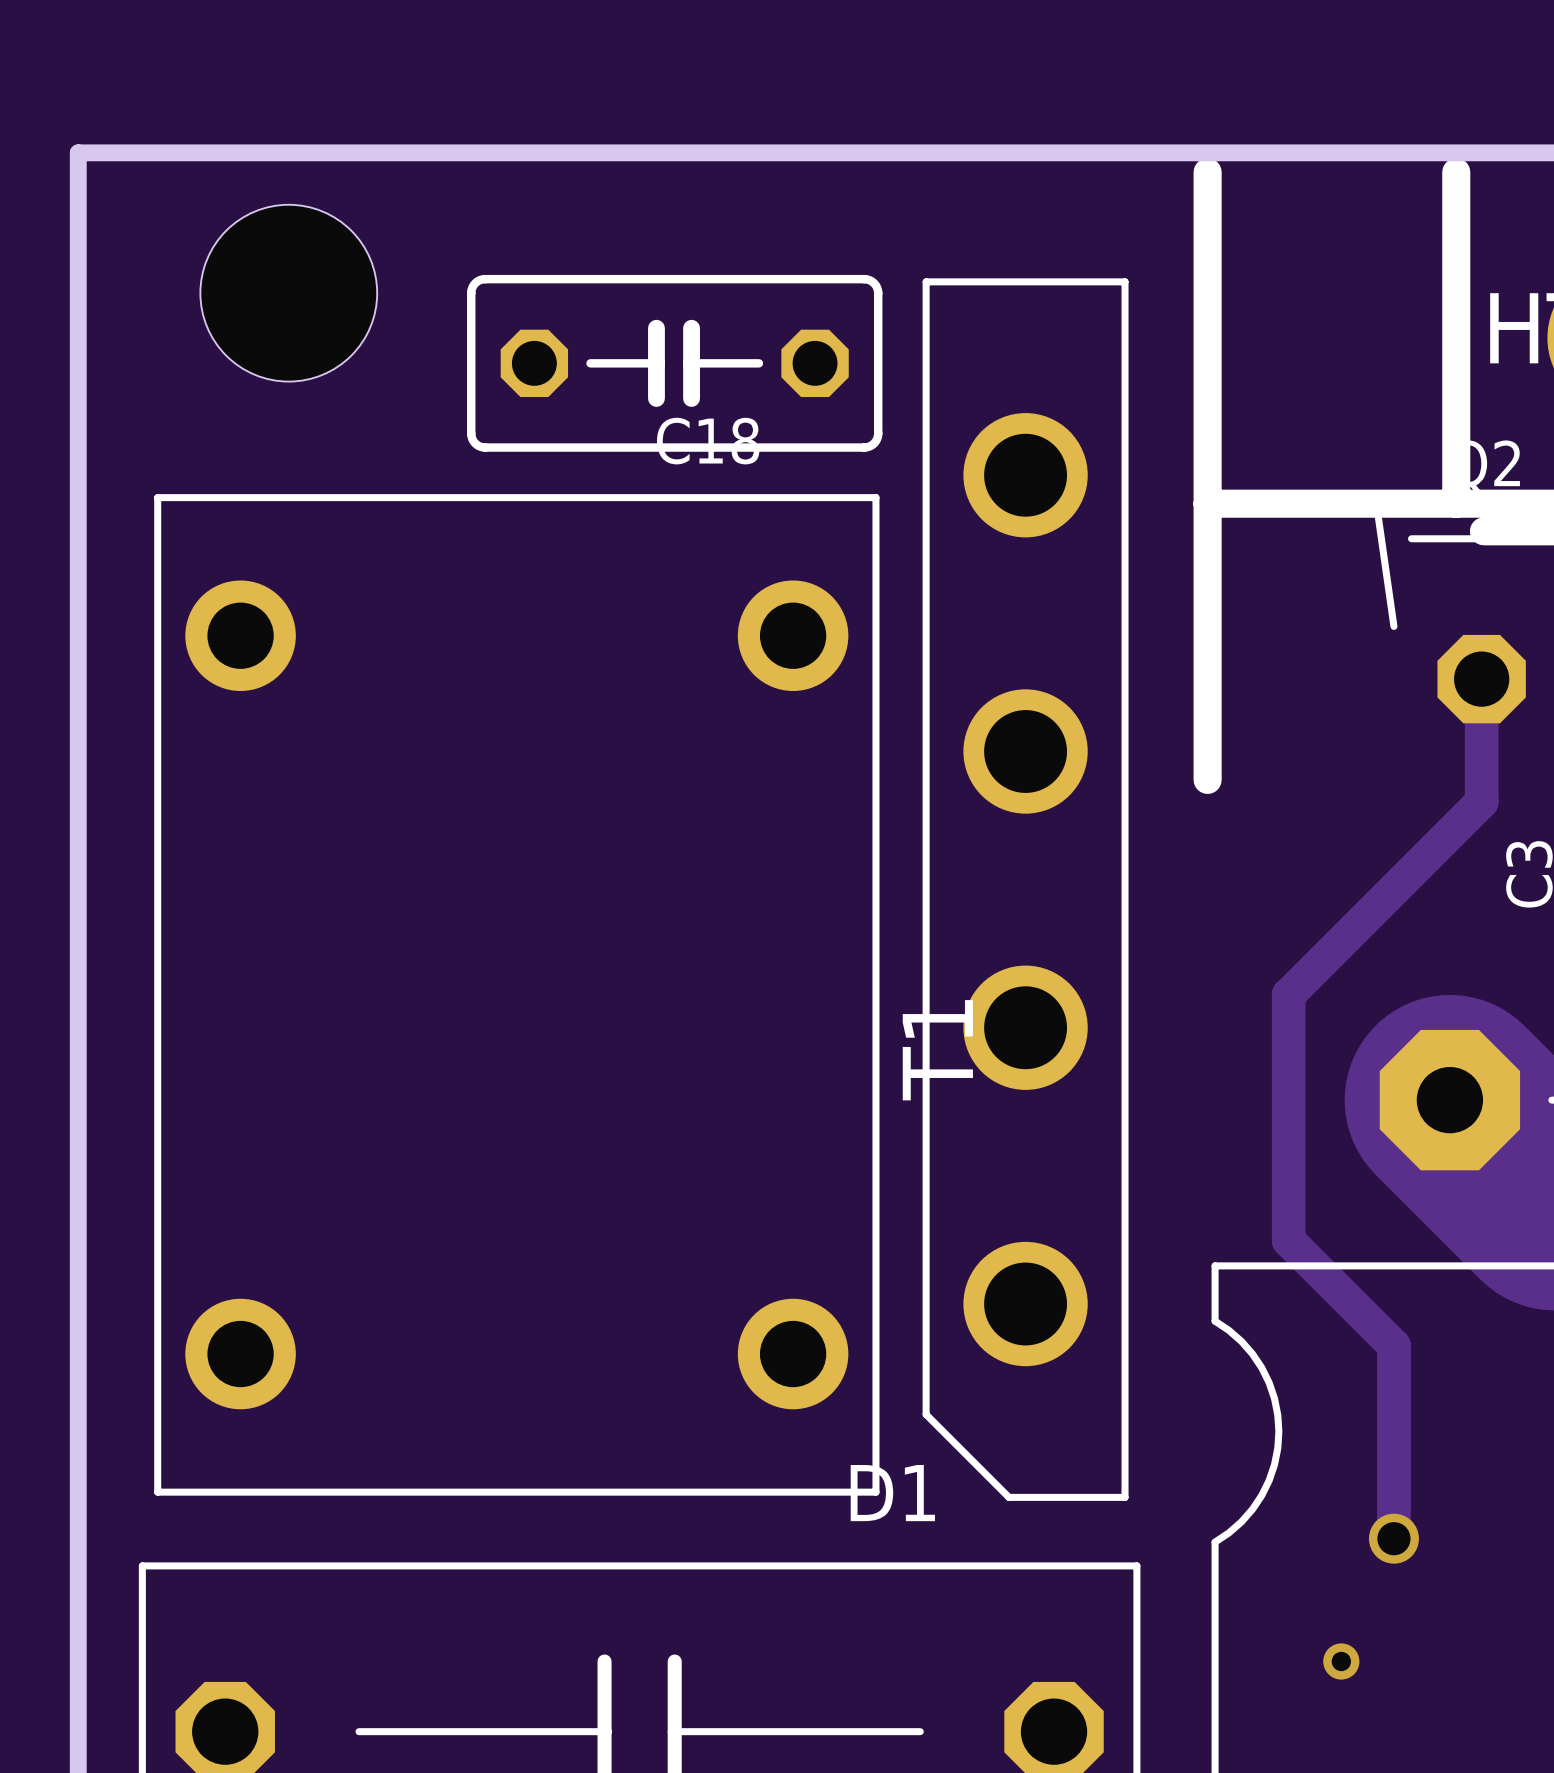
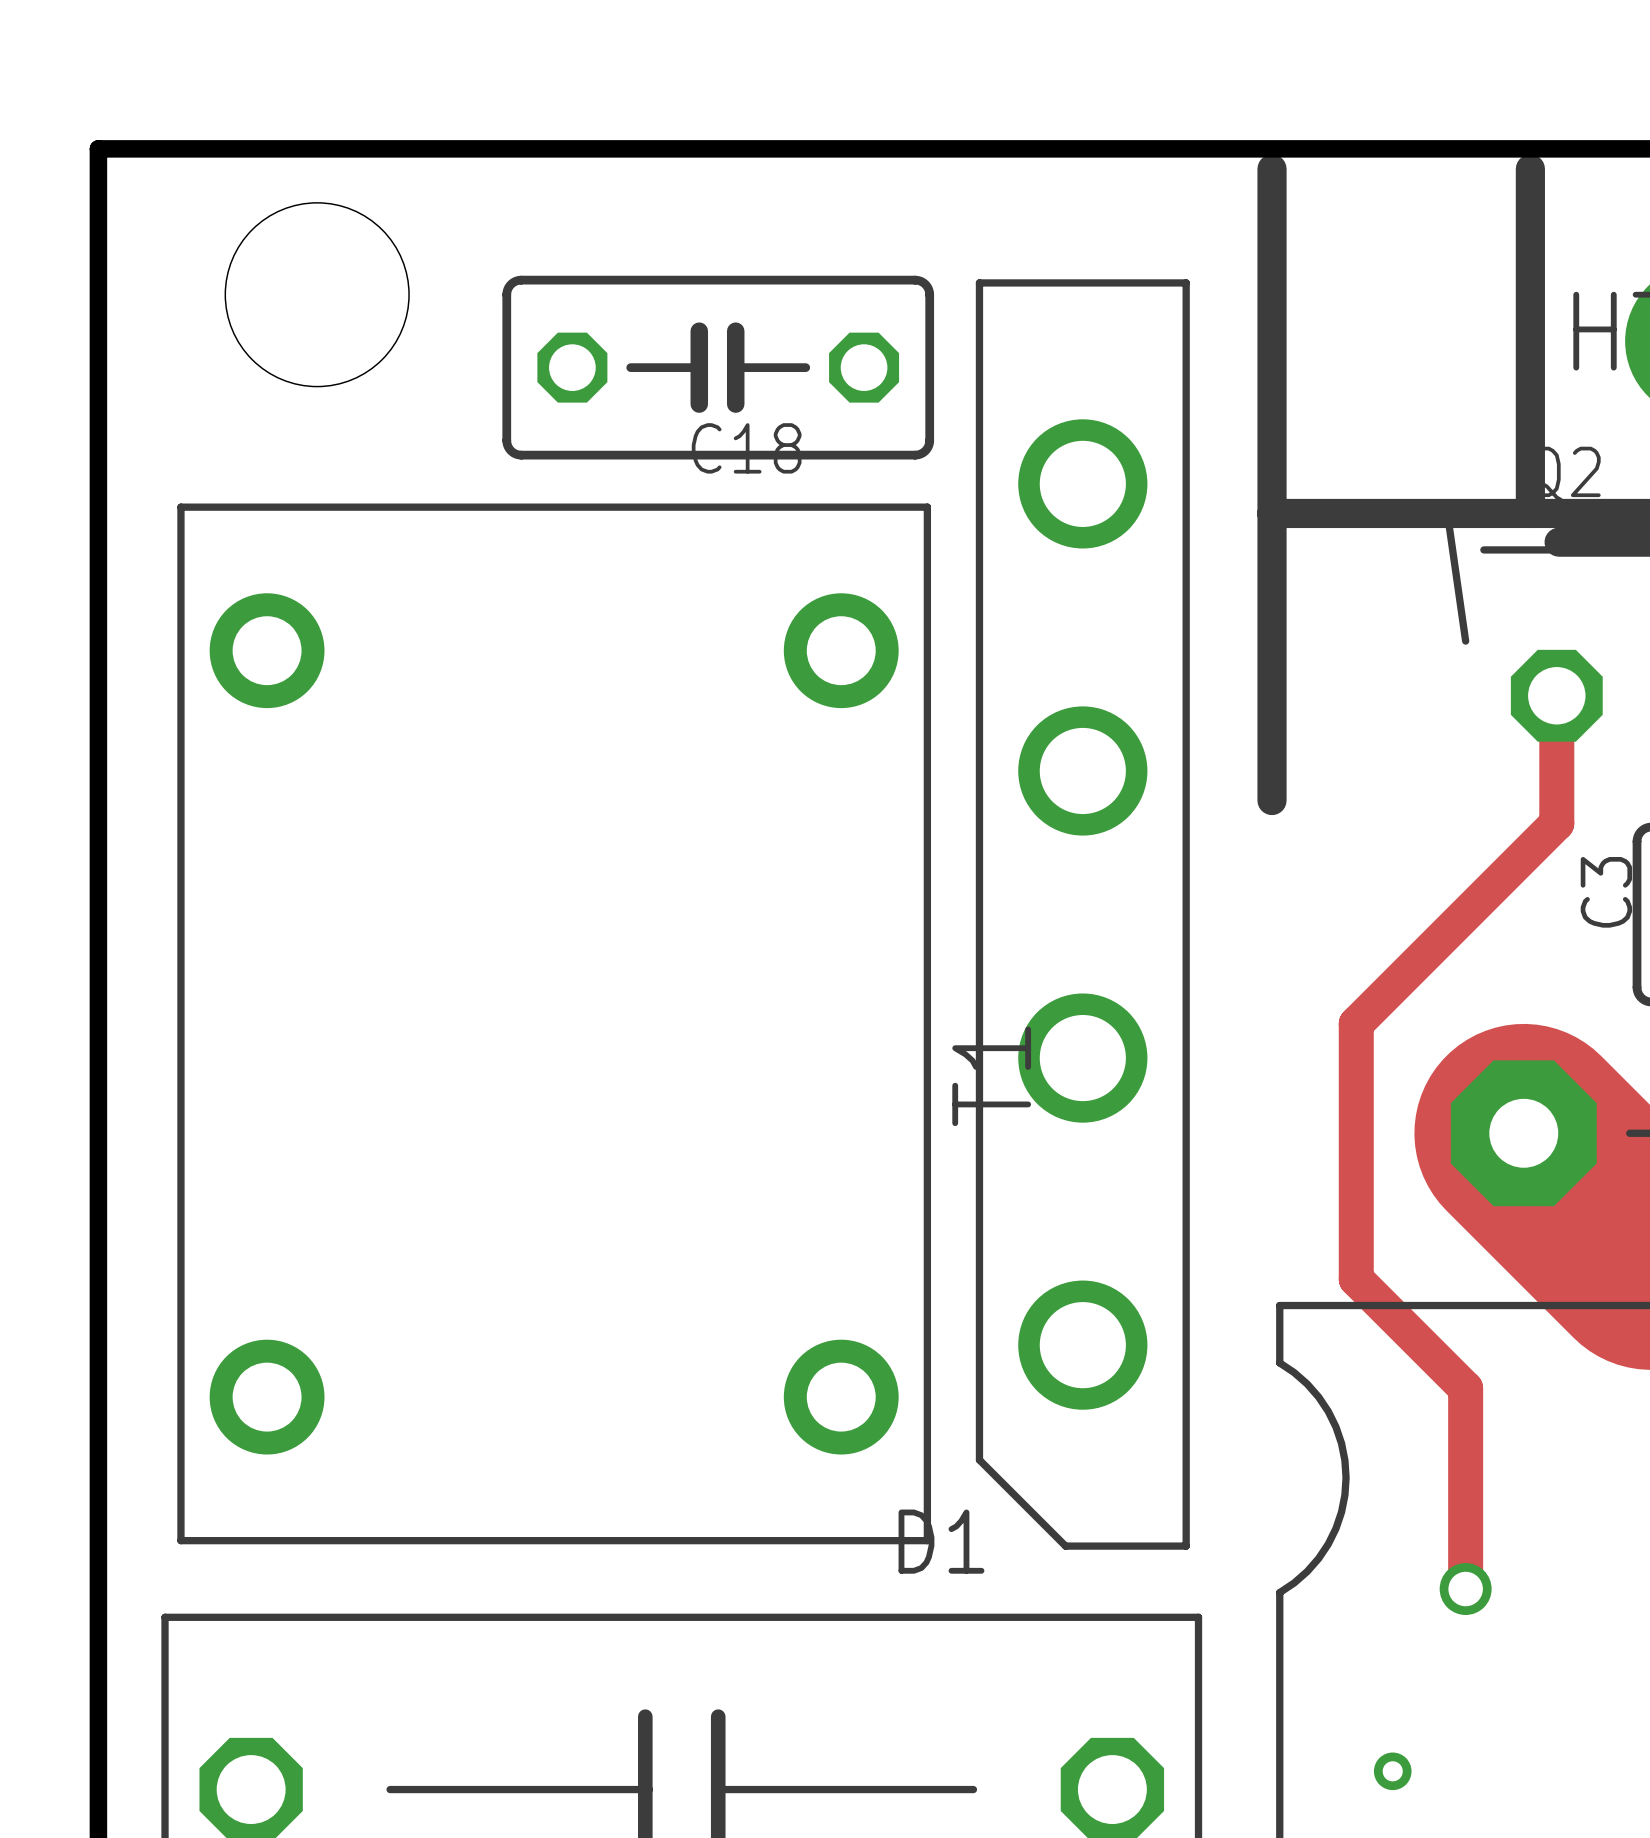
via position: (1341, 1661) -> (1392, 1771)

